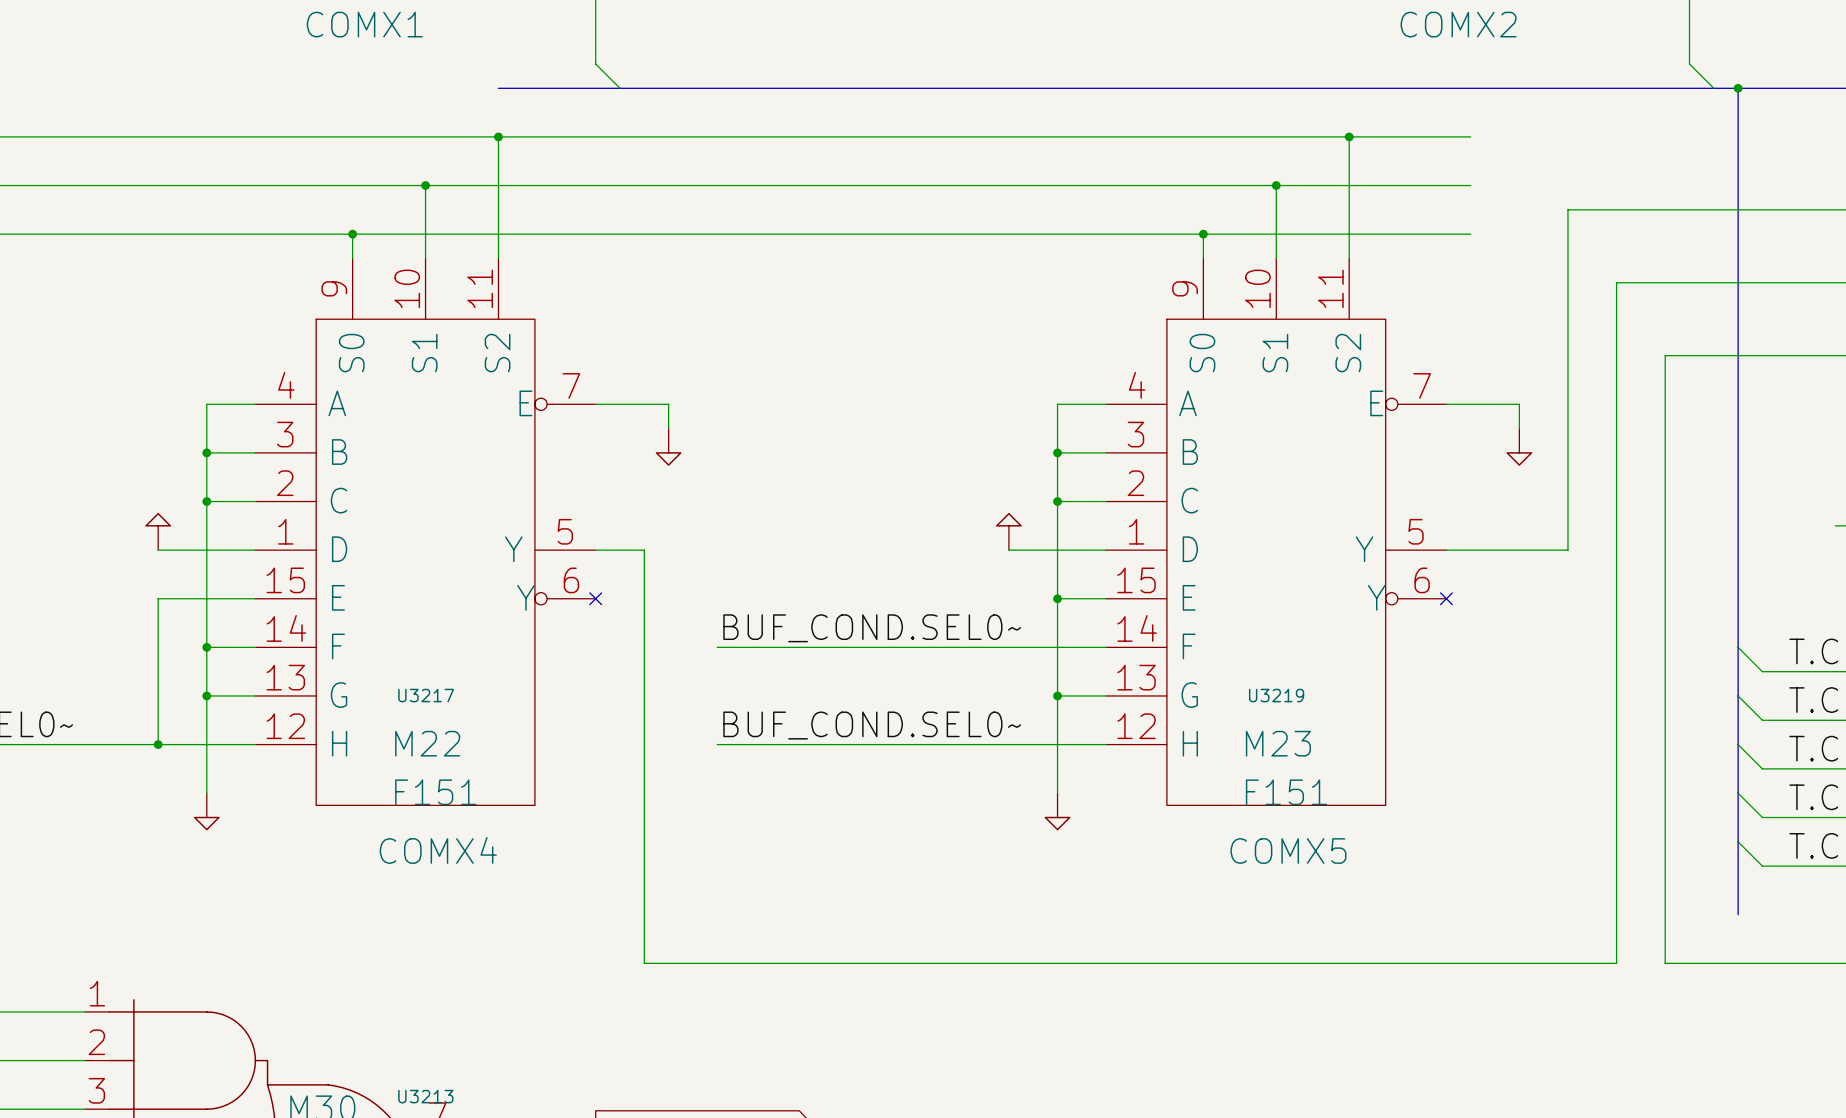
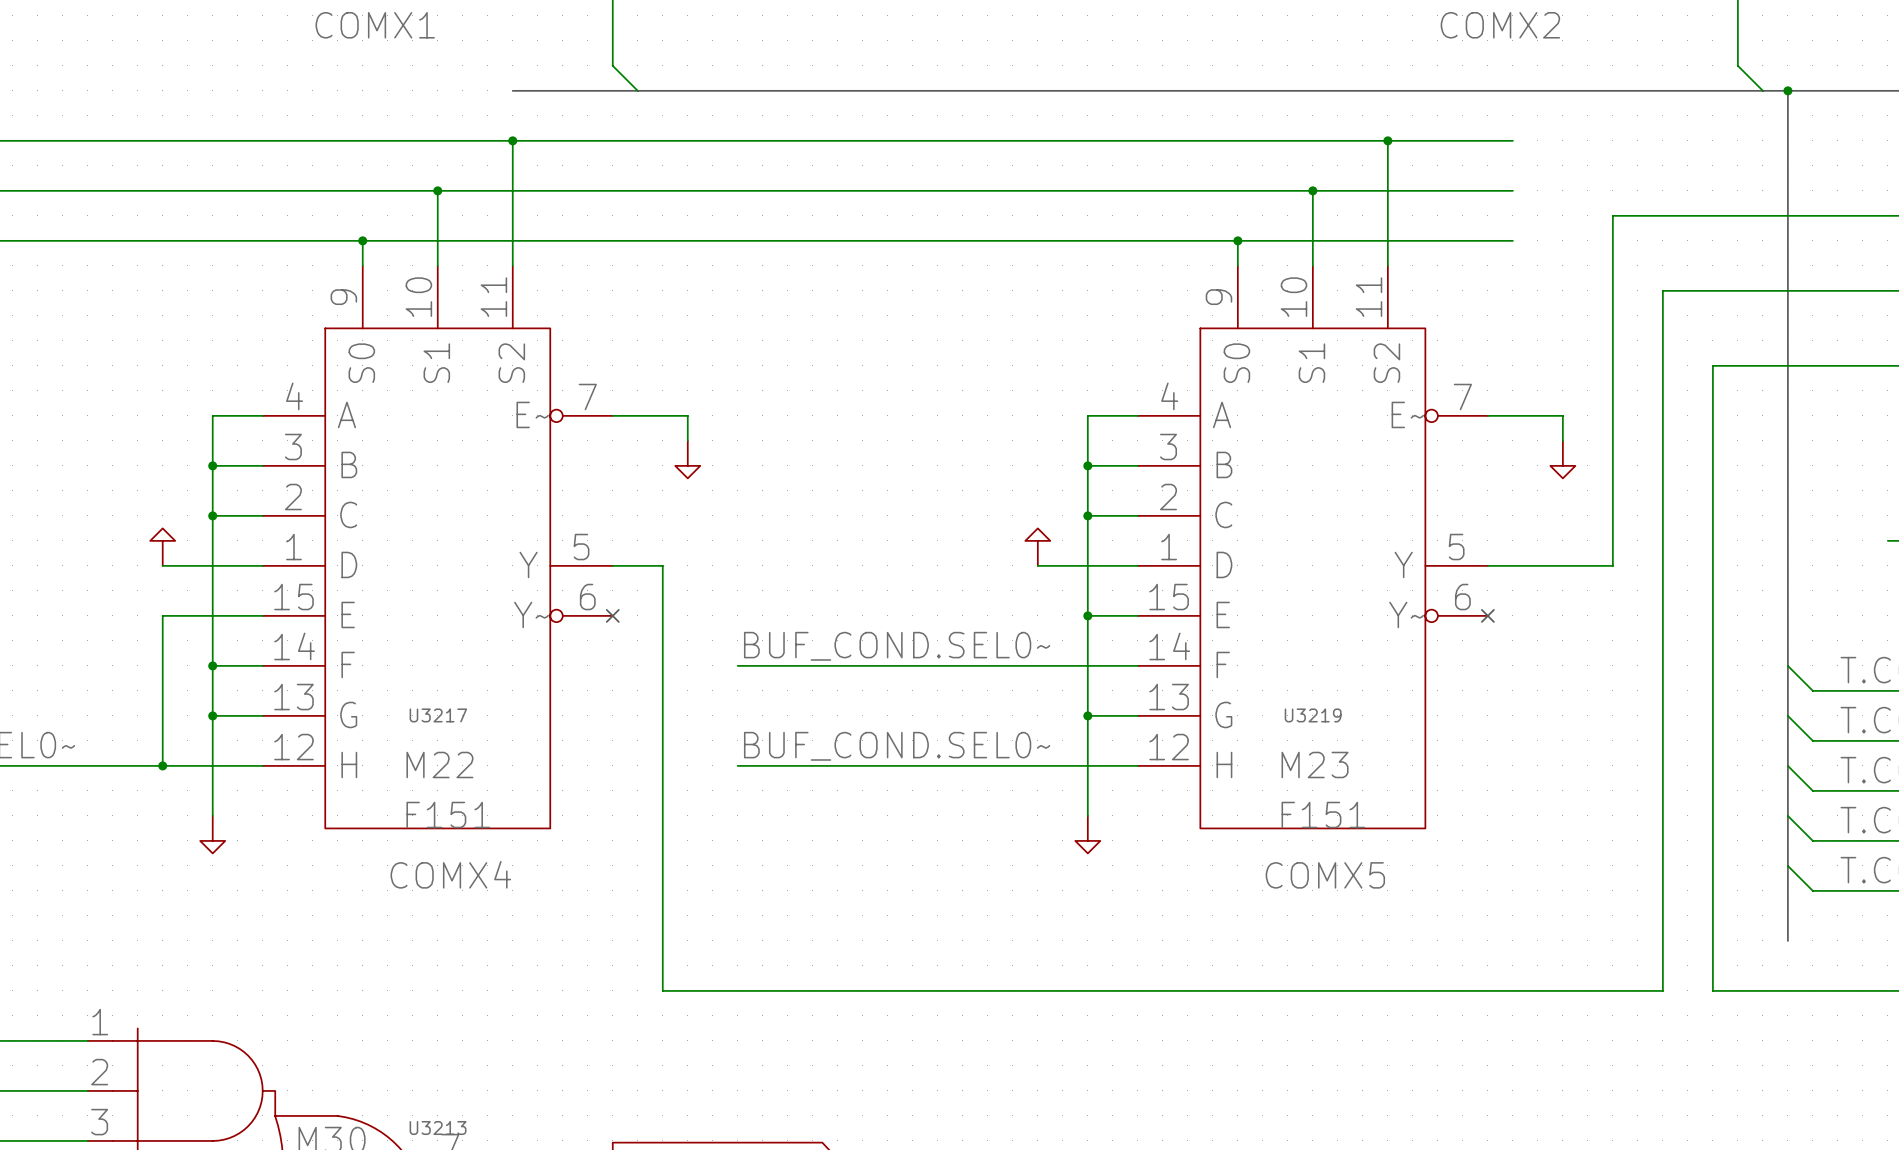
U3217 pin name: E (525, 403) -> E~ (532, 414)
U3219 pin name: E (1376, 403) -> E~ (1407, 414)
U3217 pin name: Y (525, 597) -> Y~ (531, 614)
U3219 pin name: Y (1376, 597) -> Y~ (1406, 614)

